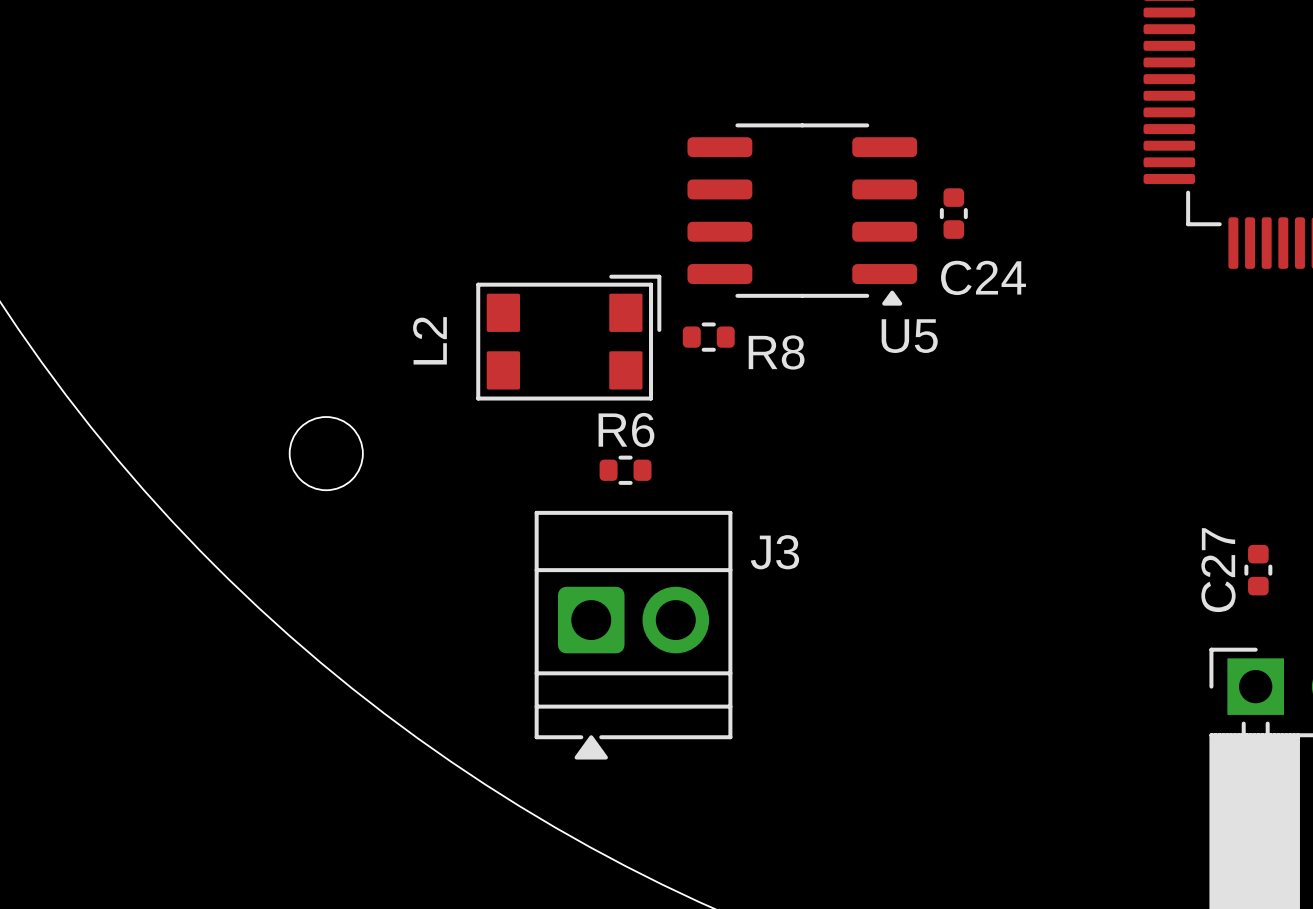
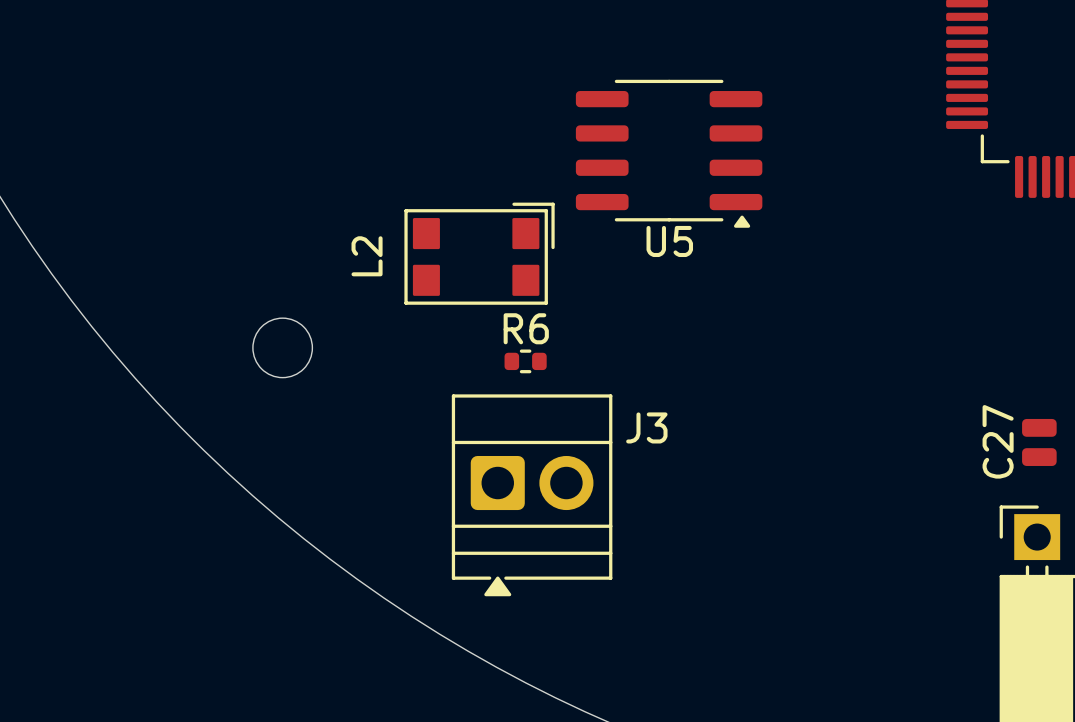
C24: (953, 213) -> none
U5 name position: U5 (909, 336) -> U5 (669, 241)
R8: (708, 337) -> none
C27 footprint: [1244, 544, 1273, 596] -> [1022, 418, 1057, 466]

